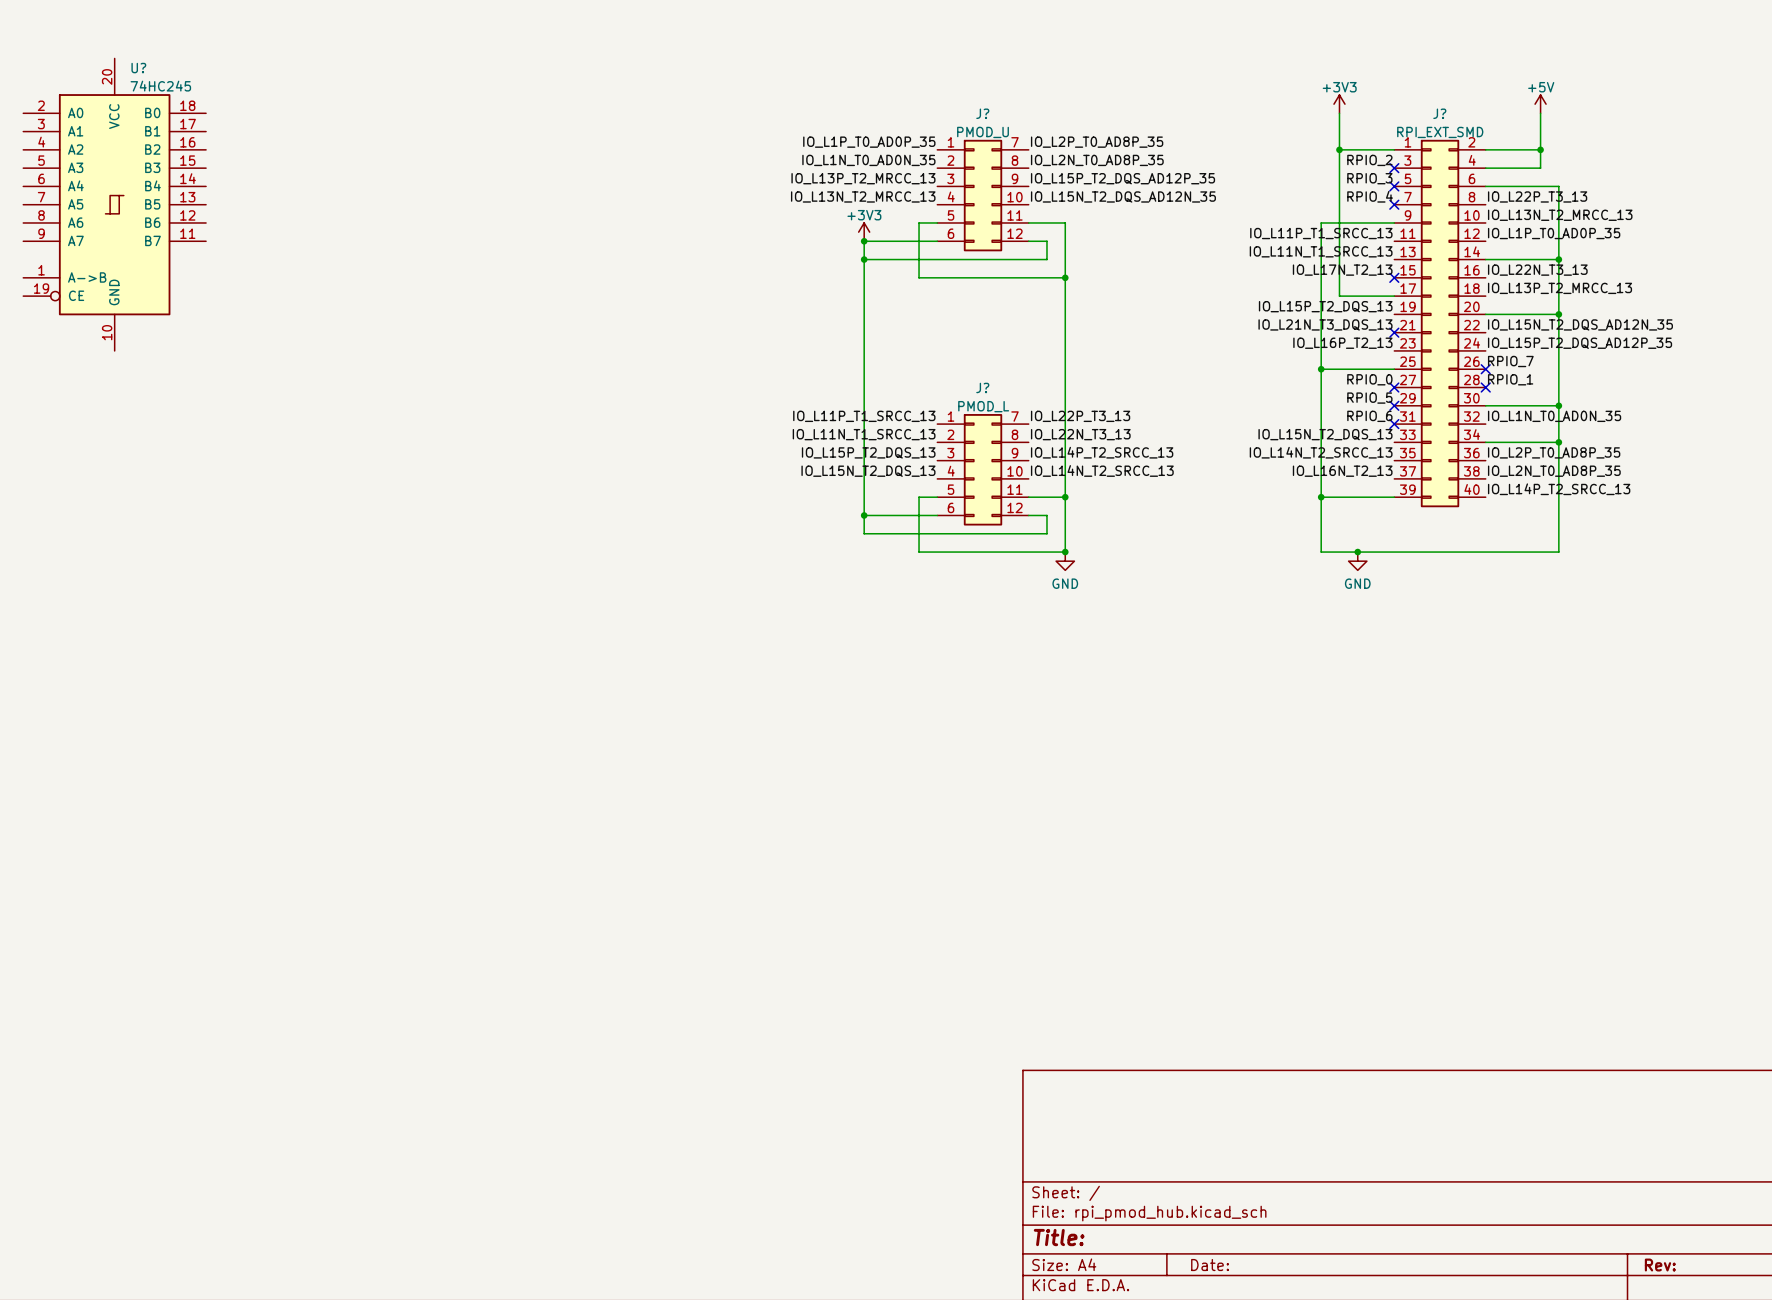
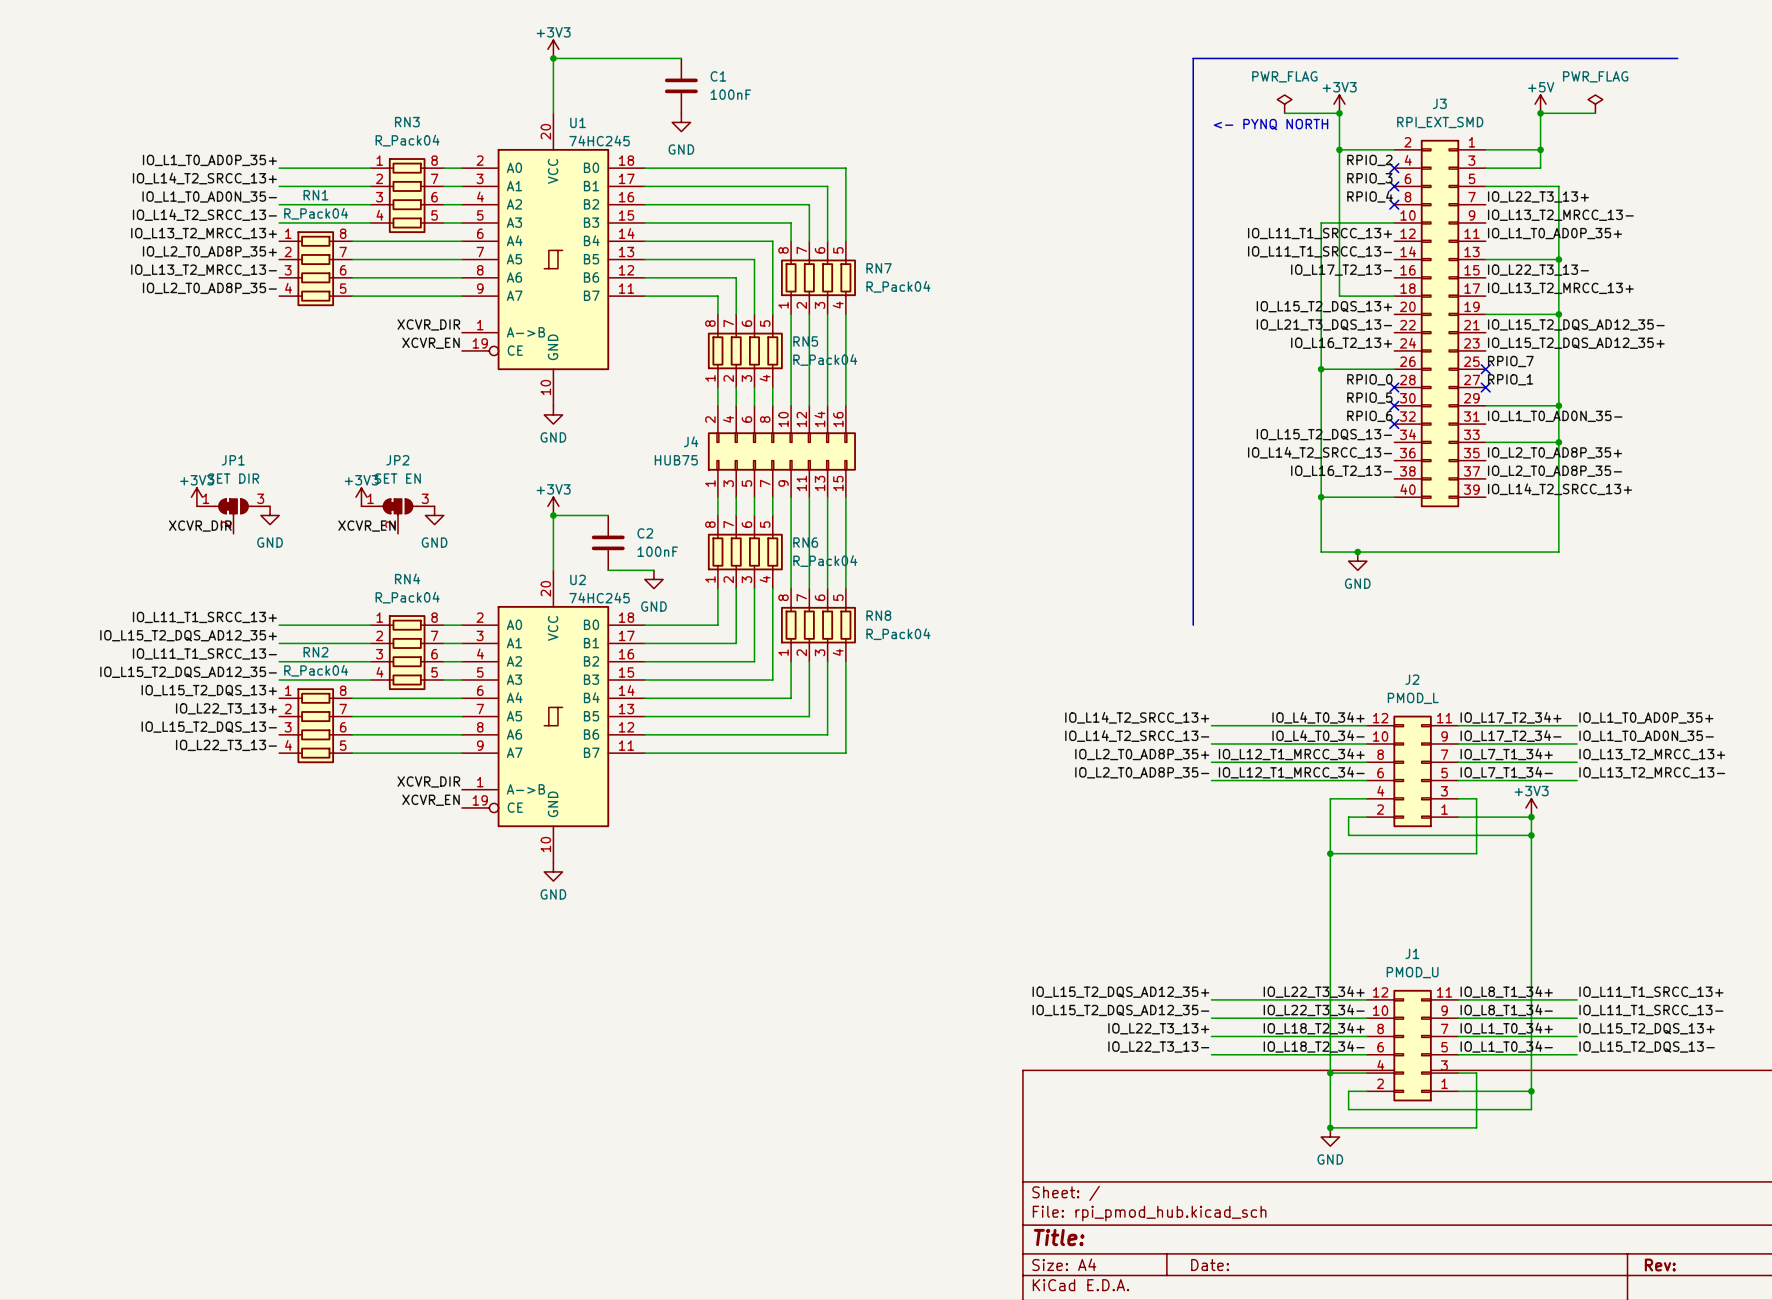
power symbol: none -> +3V3 (553, 49)
junction: none -> (553, 58)
wire: none -> (681, 58) (553, 58) (553, 113)
line: none -> (1677, 58) (1193, 58) (1193, 625)
C1: none -> 100nF (681, 85)
power symbol: none -> PWR_FLAG (1284, 104)
power symbol: none -> PWR_FLAG (1595, 104)
wire: none -> (1284, 113) (1339, 113)
junction: none -> (1339, 113)
J? name: J? (1439, 113) -> J3 (1439, 103)
wire: none -> (1540, 113) (1595, 113)
junction: none -> (1540, 113)
power symbol: none -> GND (681, 122)
text: none -> <- PYNQ NORTH (1270, 124)
label: IO_L1P_T0_AD0P_35 (869, 142) -> none
label: IO_L2P_T0_AD8P_35 (1097, 142) -> none
label: none -> IO_L1_T0_AD0P_35+ (209, 160)
label: IO_L1N_T0_AD0N_35 (868, 160) -> none
label: IO_L2N_T0_AD8P_35 (1097, 160) -> none
wire: none -> (279, 168) (370, 168)
wire: none -> (443, 168) (462, 168)
wire: none -> (644, 168) (845, 168) (845, 241)
label: none -> IO_L14_T2_SRCC_13+ (204, 178)
label: IO_L13P_T2_MRCC_13 (863, 178) -> none
label: IO_L15P_T2_DQS_AD12P_35 (1123, 178) -> none
wire: none -> (279, 186) (370, 186)
wire: none -> (443, 186) (462, 186)
wire: none -> (644, 186) (827, 186) (827, 241)
RN3: none -> R_Pack04 (407, 195)
J?: PMOD_U (983, 195) -> none
label: none -> IO_L1_T0_AD0N_35- (209, 196)
label: IO_L13N_T2_MRCC_13 (863, 196) -> none
label: IO_L15N_T2_DQS_AD12N_35 (1123, 196) -> none
label: IO_L22P_T3_13 (1537, 196) -> IO_L22_T3_13+ (1538, 196)
U?: 74HC245 (114, 204) -> none
wire: none -> (279, 204) (370, 204)
wire: none -> (443, 204) (462, 204)
wire: none -> (644, 204) (809, 204) (809, 241)
label: none -> IO_L14_T2_SRCC_13- (204, 215)
label: IO_L13N_T2_MRCC_13 (1560, 215) -> IO_L13_T2_MRCC_13- (1560, 215)
wire: none -> (279, 222) (370, 222)
wire: none -> (443, 222) (462, 222)
wire: none -> (644, 222) (791, 222) (791, 241)
wire: (937, 222) (919, 222) (919, 277) (1065, 277) -> none
wire: (1028, 222) (1065, 222) (1065, 552) (919, 552) (919, 497) (937, 497) -> none
power symbol: +3V3 (864, 232) -> none
label: none -> IO_L13_T2_MRCC_13+ (204, 233)
label: IO_L11P_T1_SRCC_13 (1321, 233) -> IO_L11_T1_SRCC_13+ (1320, 233)
label: IO_L1P_T0_AD0P_35 (1554, 233) -> IO_L1_T0_AD0P_35+ (1555, 233)
wire: none -> (352, 241) (462, 241)
wire: none -> (644, 241) (772, 241) (772, 314)
junction: (864, 241) -> none
wire: (937, 241) (864, 241) (864, 533) (1046, 533) (1046, 515) (1028, 515) -> none
wire: (1028, 241) (1046, 241) (1046, 259) (864, 259) -> none
label: none -> IO_L2_T0_AD8P_35+ (209, 251)
label: IO_L11N_T1_SRCC_13 (1321, 251) -> IO_L11_T1_SRCC_13- (1320, 251)
wire: none -> (352, 259) (462, 259)
U1: none -> 74HC245 (553, 259)
wire: none -> (644, 259) (754, 259) (754, 314)
junction: (864, 259) -> none
RN1: none -> R_Pack04 (315, 268)
label: none -> IO_L13_T2_MRCC_13- (204, 270)
label: IO_L17N_T2_13 (1342, 270) -> IO_L17_T2_13- (1341, 270)
label: IO_L22N_T3_13 (1537, 270) -> IO_L22_T3_13- (1538, 270)
wire: none -> (352, 277) (462, 277)
wire: none -> (644, 277) (736, 277) (736, 314)
RN7: none -> R_Pack04 (818, 277)
junction: (1065, 277) -> none
no-connect mark: (1394, 277) -> none
label: none -> IO_L2_T0_AD8P_35- (209, 288)
label: IO_L13P_T2_MRCC_13 (1560, 288) -> IO_L13_T2_MRCC_13+ (1560, 288)
wire: none -> (352, 296) (462, 296)
wire: none -> (644, 296) (717, 296) (717, 314)
label: IO_L15P_T2_DQS_13 (1325, 306) -> IO_L15_T2_DQS_13+ (1324, 306)
wire: none -> (791, 314) (791, 405)
wire: none -> (809, 314) (809, 405)
wire: none -> (827, 314) (827, 405)
wire: none -> (845, 314) (845, 405)
J? flip: as is (1440, 323) -> left-right (1440, 323)
label: none -> XCVR_DIR (428, 324)
label: IO_L21N_T3_DQS_13 (1325, 324) -> IO_L21_T3_DQS_13- (1324, 324)
label: IO_L15N_T2_DQS_AD12N_35 (1580, 324) -> IO_L15_T2_DQS_AD12_35- (1576, 324)
no-connect mark: (1394, 332) -> none
label: none -> XCVR_EN (431, 343)
label: IO_L16P_T2_13 (1342, 343) -> IO_L16_T2_13+ (1341, 343)
label: IO_L15P_T2_DQS_AD12P_35 (1580, 343) -> IO_L15_T2_DQS_AD12_35+ (1576, 343)
RN5: none -> R_Pack04 (745, 350)
wire: none -> (717, 387) (717, 405)
wire: none -> (736, 387) (736, 405)
wire: none -> (754, 387) (754, 405)
wire: none -> (772, 387) (772, 405)
power symbol: none -> GND (553, 414)
label: IO_L11P_T1_SRCC_13 (864, 416) -> none
label: IO_L22P_T3_13 (1080, 416) -> none
label: IO_L1N_T0_AD0N_35 (1554, 416) -> IO_L1_T0_AD0N_35- (1555, 416)
label: IO_L11N_T1_SRCC_13 (864, 434) -> none
label: IO_L22N_T3_13 (1080, 434) -> none
label: IO_L15N_T2_DQS_13 (1325, 434) -> IO_L15_T2_DQS_13- (1324, 434)
J4: none -> HUB75 (781, 451)
label: IO_L15P_T2_DQS_13 (868, 452) -> none
label: IO_L14P_T2_SRCC_13 (1102, 452) -> none
label: IO_L14N_T2_SRCC_13 (1321, 452) -> IO_L14_T2_SRCC_13- (1320, 452)
label: IO_L2P_T0_AD8P_35 (1554, 452) -> IO_L2_T0_AD8P_35+ (1555, 452)
J?: PMOD_L (983, 469) -> none
label: IO_L14N_T2_SRCC_13 (1102, 470) -> none
label: IO_L15N_T2_DQS_13 (868, 471) -> none
label: IO_L16N_T2_13 (1342, 471) -> IO_L16_T2_13- (1341, 471)
label: IO_L2N_T0_AD8P_35 (1554, 471) -> IO_L2_T0_AD8P_35- (1555, 471)
label: IO_L14P_T2_SRCC_13 (1559, 489) -> IO_L14_T2_SRCC_13+ (1560, 489)
power symbol: none -> +3V3 (196, 497)
power symbol: none -> +3V3 (361, 497)
wire: none -> (717, 497) (717, 515)
wire: none -> (736, 497) (736, 515)
wire: none -> (754, 497) (754, 515)
wire: none -> (772, 497) (772, 515)
wire: none -> (791, 497) (791, 588)
wire: none -> (809, 497) (809, 588)
wire: none -> (827, 497) (827, 588)
wire: none -> (845, 497) (845, 588)
wire: (1028, 497) (1065, 497) -> none
junction: (1065, 497) -> none
power symbol: none -> +3V3 (553, 506)
power symbol: none -> GND (270, 515)
power symbol: none -> GND (434, 515)
junction: none -> (553, 515)
wire: none -> (608, 515) (553, 515) (553, 570)
wire: (864, 515) (937, 515) -> none
junction: (864, 515) -> none
JP1: none -> SET DIR (233, 516)
JP2: none -> SET EN (398, 516)
label: none -> XCVR_DIR (200, 526)
label: none -> XCVR_EN (367, 526)
C2: none -> 100nF (608, 542)
RN6: none -> R_Pack04 (745, 552)
junction: (1065, 552) -> none
power symbol: GND (1065, 561) -> none
wire: none -> (608, 570) (653, 570)
power symbol: none -> GND (653, 579)
wire: none -> (717, 588) (717, 625) (644, 625)
wire: none -> (736, 588) (736, 643) (644, 643)
wire: none -> (754, 588) (754, 661) (644, 661)
wire: none -> (772, 588) (772, 680) (644, 680)
label: none -> IO_L11_T1_SRCC_13+ (204, 617)
wire: none -> (279, 625) (370, 625)
wire: none -> (443, 625) (462, 625)
RN8: none -> R_Pack04 (818, 625)
label: none -> IO_L15_T2_DQS_AD12_35+ (188, 635)
wire: none -> (279, 643) (370, 643)
wire: none -> (443, 643) (462, 643)
RN4: none -> R_Pack04 (407, 652)
label: none -> IO_L11_T1_SRCC_13- (204, 654)
wire: none -> (279, 661) (370, 661)
wire: none -> (443, 661) (462, 661)
wire: none -> (791, 661) (791, 698) (644, 698)
wire: none -> (809, 661) (809, 716) (644, 716)
wire: none -> (827, 661) (827, 734) (644, 734)
wire: none -> (845, 661) (845, 753) (644, 753)
label: none -> IO_L15_T2_DQS_AD12_35- (188, 672)
wire: none -> (279, 680) (370, 680)
wire: none -> (443, 680) (462, 680)
label: none -> IO_L15_T2_DQS_13+ (209, 690)
wire: none -> (352, 698) (462, 698)
label: none -> IO_L22_T3_13+ (226, 708)
wire: none -> (352, 716) (462, 716)
U2: none -> 74HC245 (553, 716)
label: none -> IO_L14_T2_SRCC_13+ (1137, 717)
label: none -> IO_L4_T0_34+ (1318, 717)
label: none -> IO_L17_T2_34+ (1511, 717)
label: none -> IO_L1_T0_AD0P_35+ (1646, 717)
RN2: none -> R_Pack04 (315, 725)
wire: none -> (1211, 725) (1366, 725)
wire: none -> (1458, 725) (1577, 725)
label: none -> IO_L15_T2_DQS_13- (209, 727)
wire: none -> (352, 734) (462, 734)
label: none -> IO_L14_T2_SRCC_13- (1137, 736)
label: none -> IO_L4_T0_34- (1318, 736)
label: none -> IO_L17_T2_34- (1511, 736)
label: none -> IO_L1_T0_AD0N_35- (1646, 736)
wire: none -> (1211, 743) (1366, 743)
wire: none -> (1458, 743) (1577, 743)
label: none -> IO_L22_T3_13- (226, 745)
wire: none -> (352, 753) (462, 753)
label: none -> IO_L2_T0_AD8P_35+ (1142, 754)
label: none -> IO_L12_T1_MRCC_34+ (1291, 754)
label: none -> IO_L7_T1_34+ (1506, 754)
label: none -> IO_L13_T2_MRCC_13+ (1652, 754)
wire: none -> (1211, 762) (1366, 762)
wire: none -> (1458, 762) (1577, 762)
J2: none -> PMOD_L (1412, 771)
label: none -> IO_L2_T0_AD8P_35- (1142, 772)
label: none -> IO_L12_T1_MRCC_34- (1291, 772)
label: none -> IO_L7_T1_34- (1506, 772)
label: none -> IO_L13_T2_MRCC_13- (1652, 772)
wire: none -> (1211, 780) (1366, 780)
wire: none -> (1458, 780) (1577, 780)
label: none -> XCVR_DIR (428, 781)
wire: none -> (1366, 798) (1330, 798) (1330, 1127) (1476, 1127) (1476, 1073) (1458, 1073)
wire: none -> (1458, 798) (1476, 798) (1476, 853) (1330, 853)
label: none -> XCVR_EN (431, 800)
power symbol: none -> +3V3 (1531, 807)
wire: none -> (1366, 817) (1348, 817) (1348, 835) (1531, 835)
wire: none -> (1458, 817) (1531, 817) (1531, 1109) (1348, 1109) (1348, 1091) (1366, 1091)
junction: none -> (1531, 817)
junction: none -> (1531, 835)
junction: none -> (1330, 853)
power symbol: none -> GND (553, 871)
label: none -> IO_L22_T3_34+ (1314, 991)
label: none -> IO_L8_T1_34+ (1506, 991)
label: none -> IO_L15_T2_DQS_AD12_35+ (1120, 992)
label: none -> IO_L11_T1_SRCC_13+ (1651, 992)
wire: none -> (1211, 999) (1366, 999)
wire: none -> (1458, 999) (1577, 999)
label: none -> IO_L15_T2_DQS_AD12_35- (1120, 1010)
label: none -> IO_L22_T3_34- (1314, 1010)
label: none -> IO_L8_T1_34- (1506, 1010)
label: none -> IO_L11_T1_SRCC_13- (1651, 1010)
wire: none -> (1211, 1018) (1366, 1018)
wire: none -> (1458, 1018) (1577, 1018)
label: none -> IO_L22_T3_13+ (1158, 1028)
label: none -> IO_L18_T2_34+ (1314, 1028)
label: none -> IO_L1_T0_34+ (1506, 1028)
label: none -> IO_L15_T2_DQS_13+ (1647, 1028)
wire: none -> (1211, 1036) (1366, 1036)
wire: none -> (1458, 1036) (1577, 1036)
J1: none -> PMOD_U (1412, 1045)
label: none -> IO_L18_T2_34- (1314, 1046)
label: none -> IO_L1_T0_34- (1506, 1046)
label: none -> IO_L22_T3_13- (1158, 1047)
label: none -> IO_L15_T2_DQS_13- (1647, 1047)
wire: none -> (1211, 1054) (1366, 1054)
wire: none -> (1458, 1054) (1577, 1054)
wire: none -> (1330, 1073) (1366, 1073)
junction: none -> (1330, 1073)
wire: none -> (1458, 1091) (1531, 1091)
junction: none -> (1531, 1091)
junction: none -> (1330, 1127)
power symbol: none -> GND (1330, 1137)

